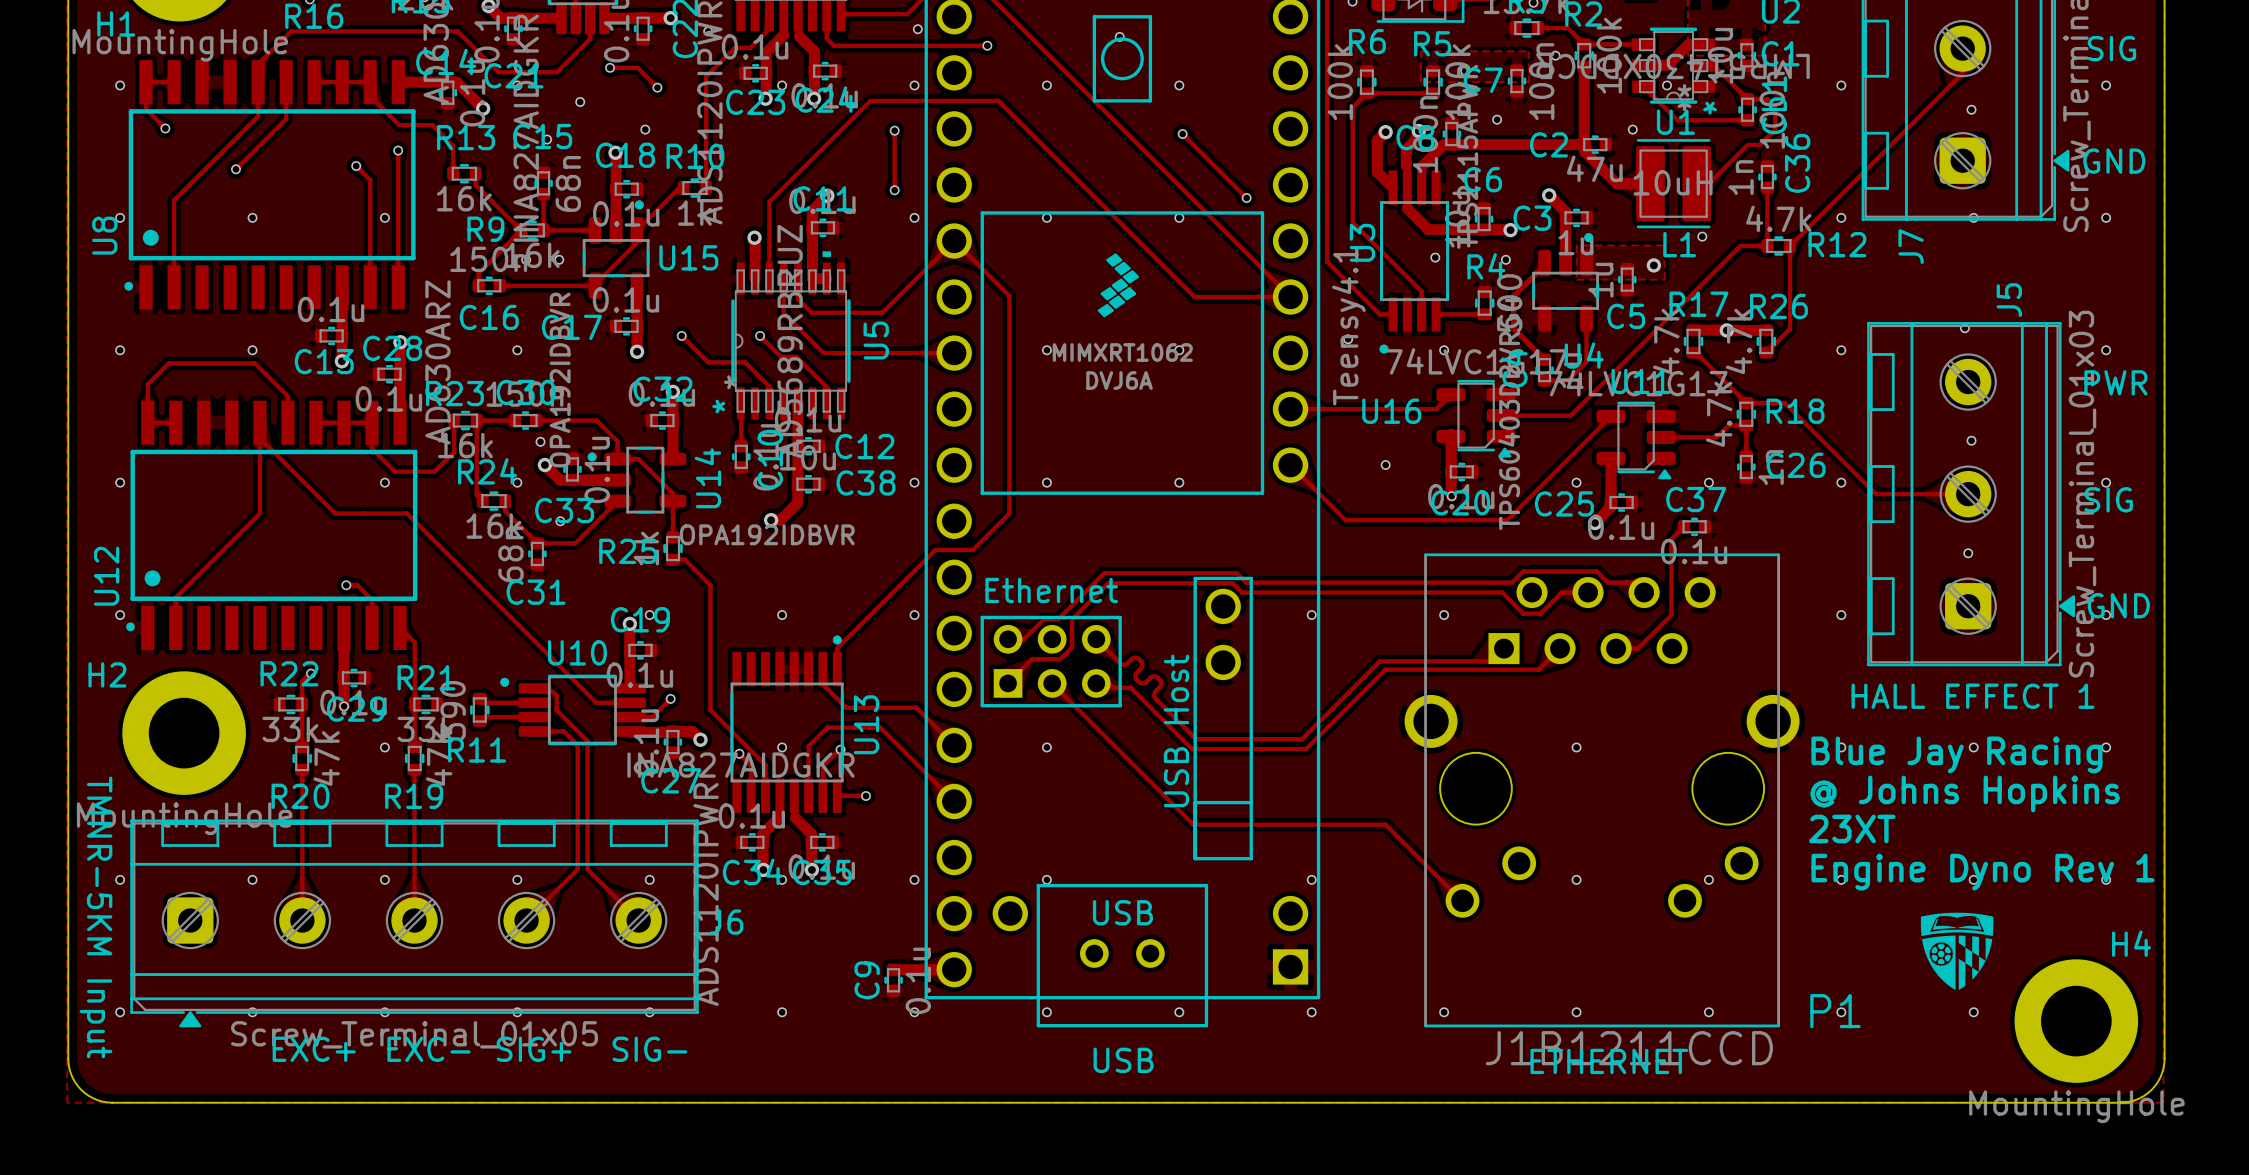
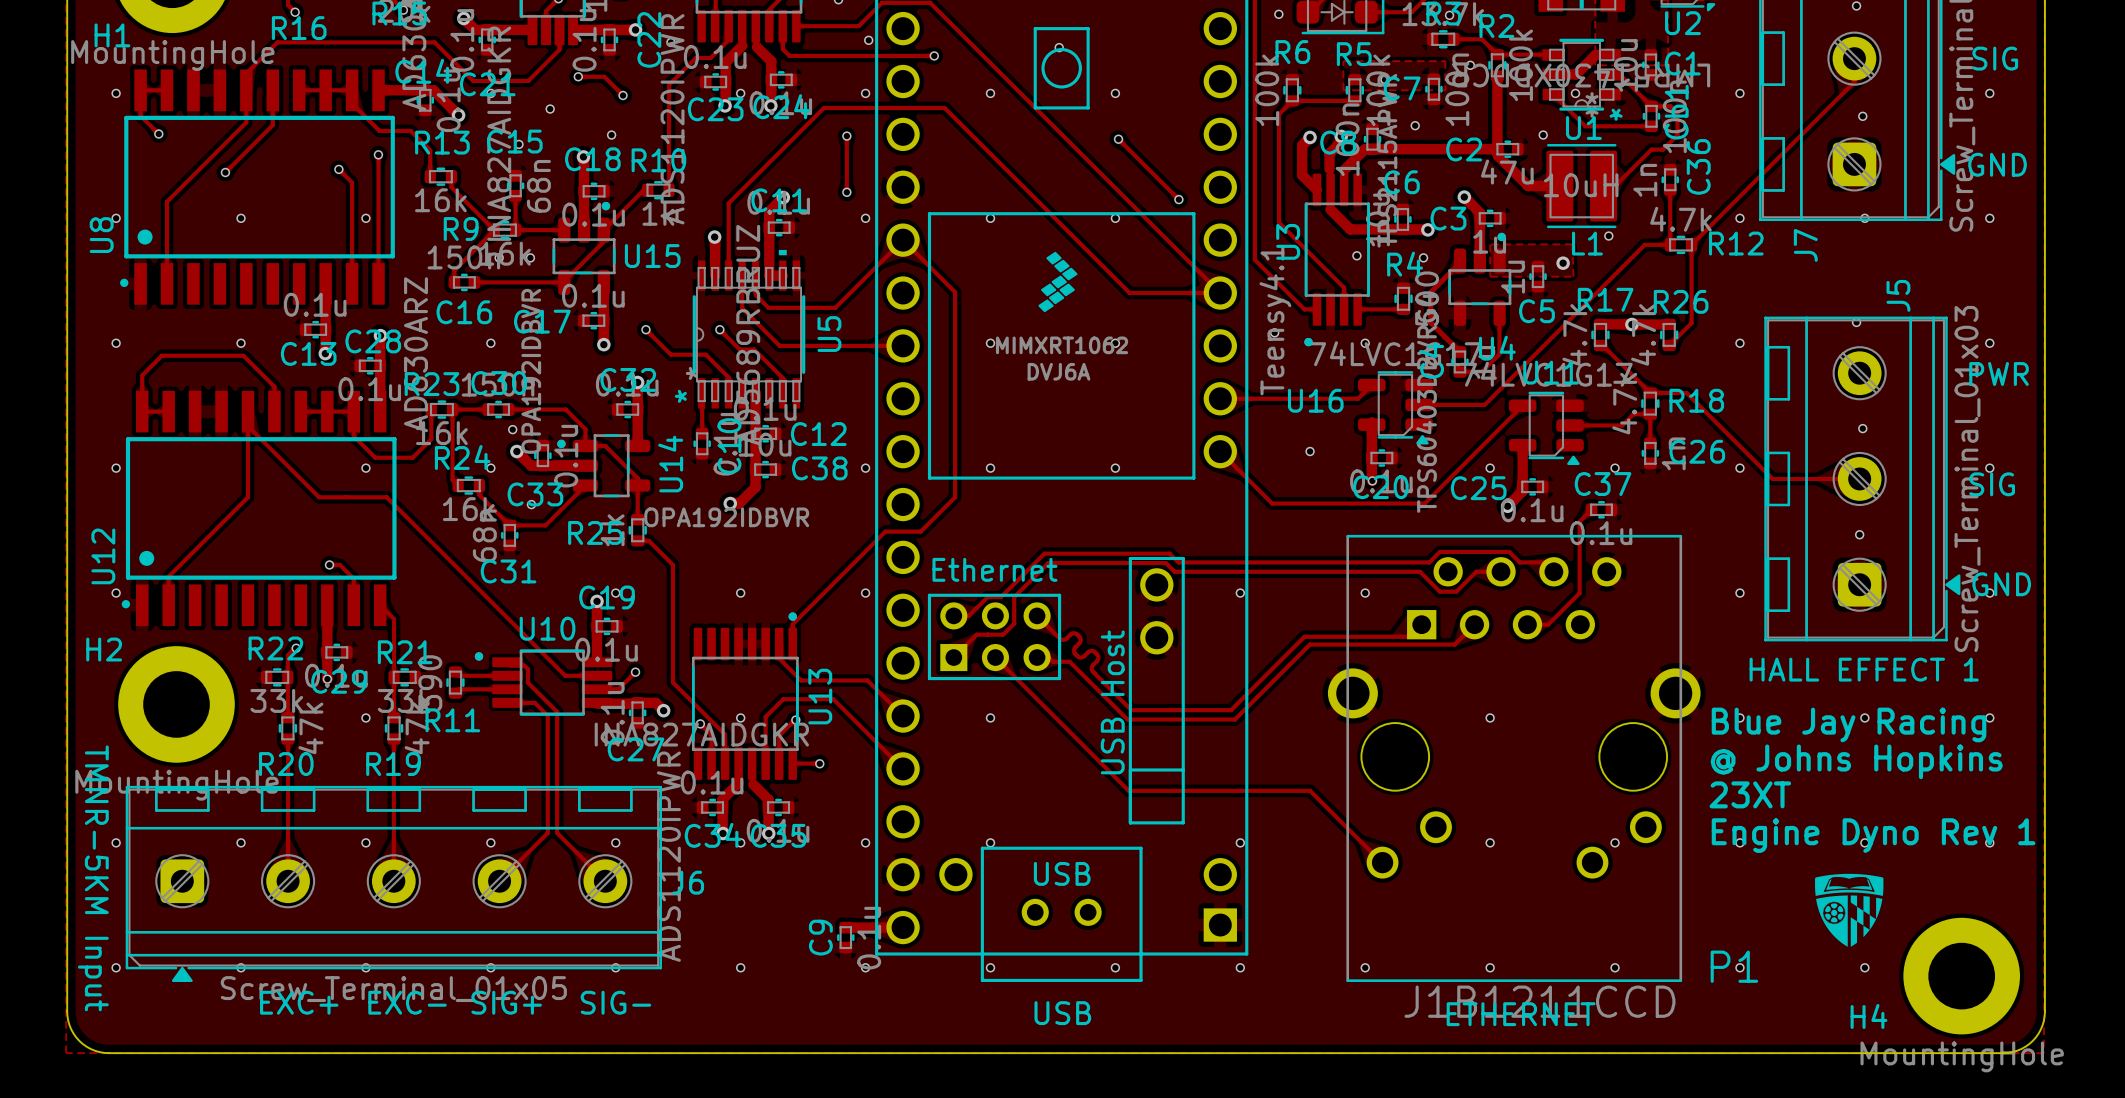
H4 name position: H4 (2131, 943) -> H4 (1868, 1016)

